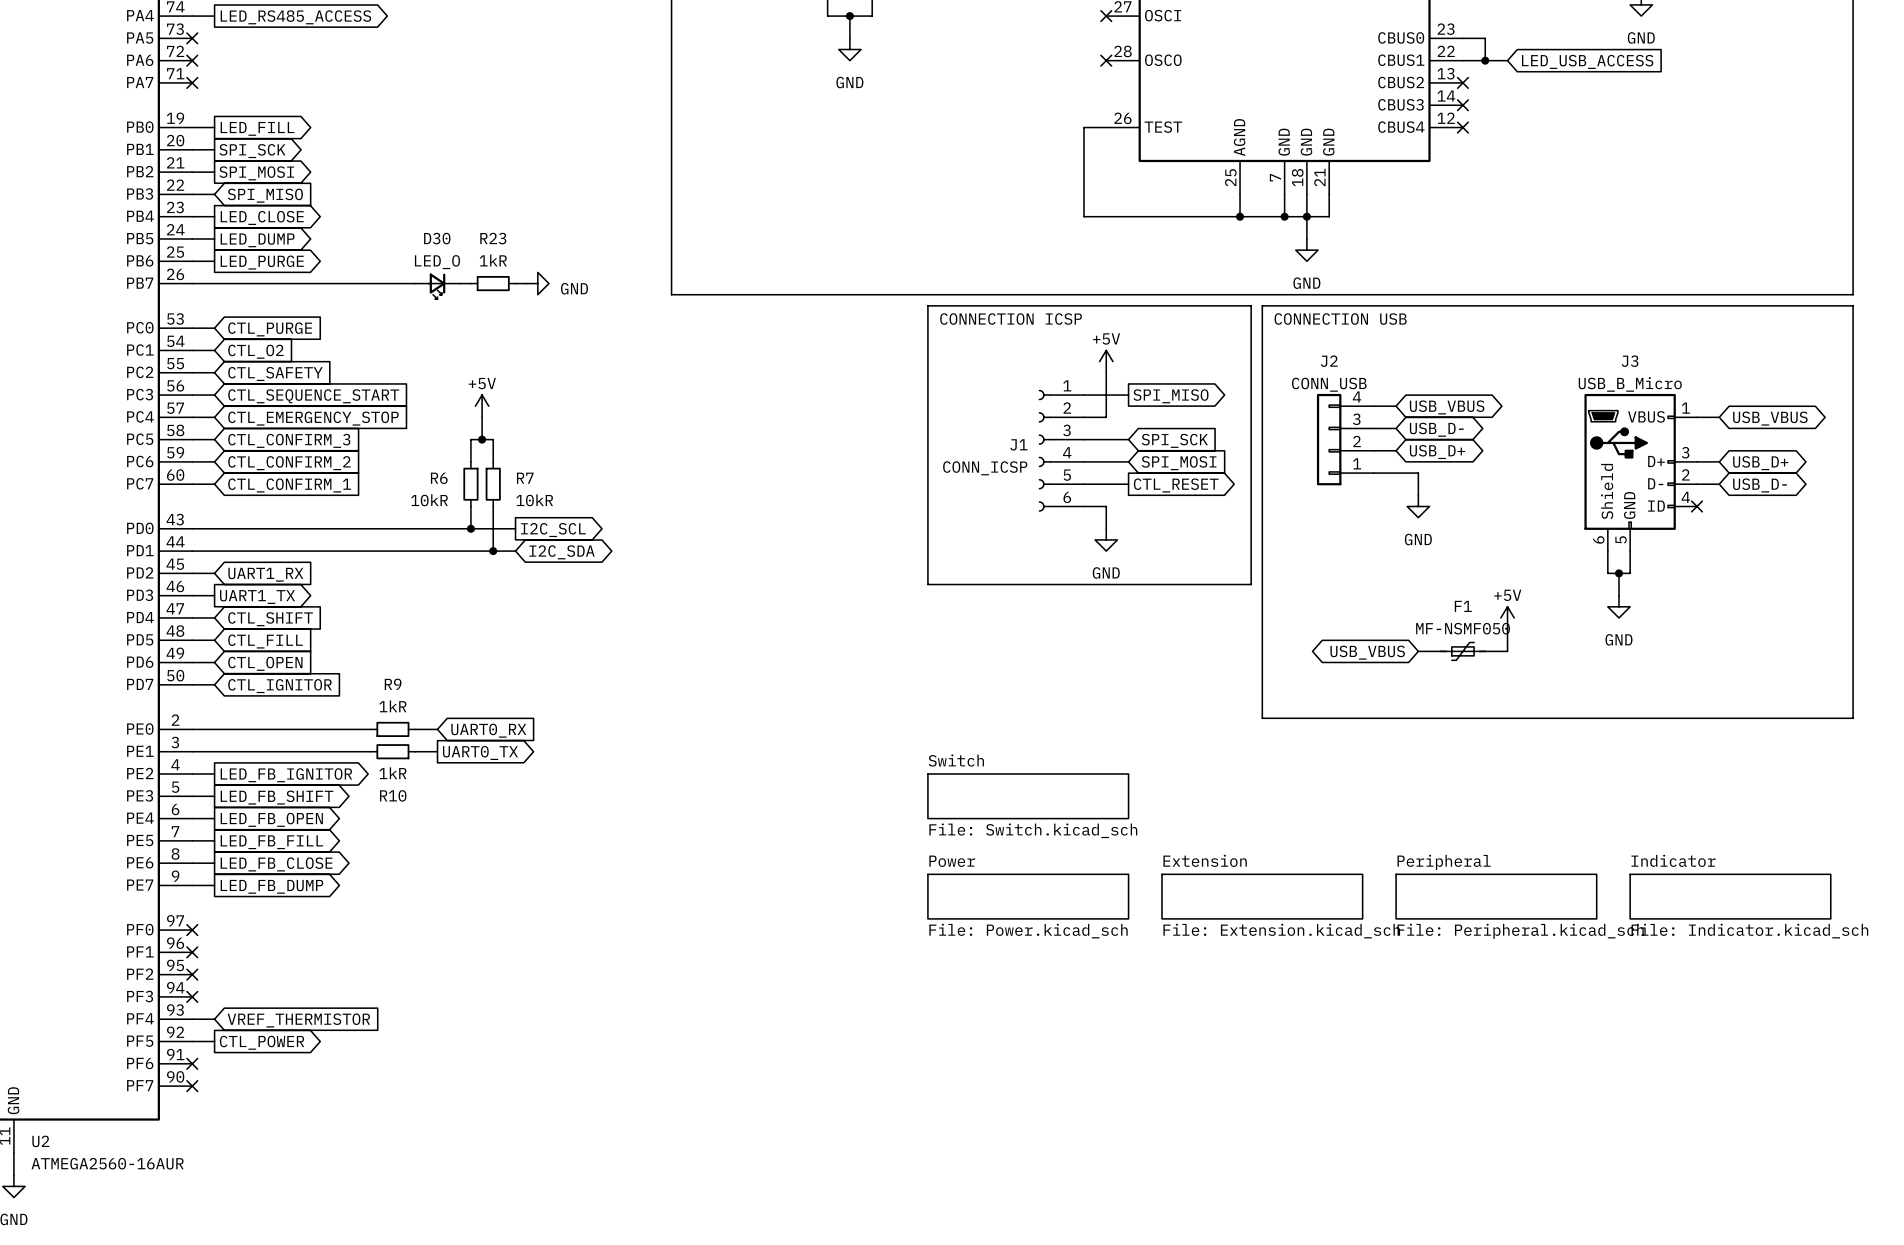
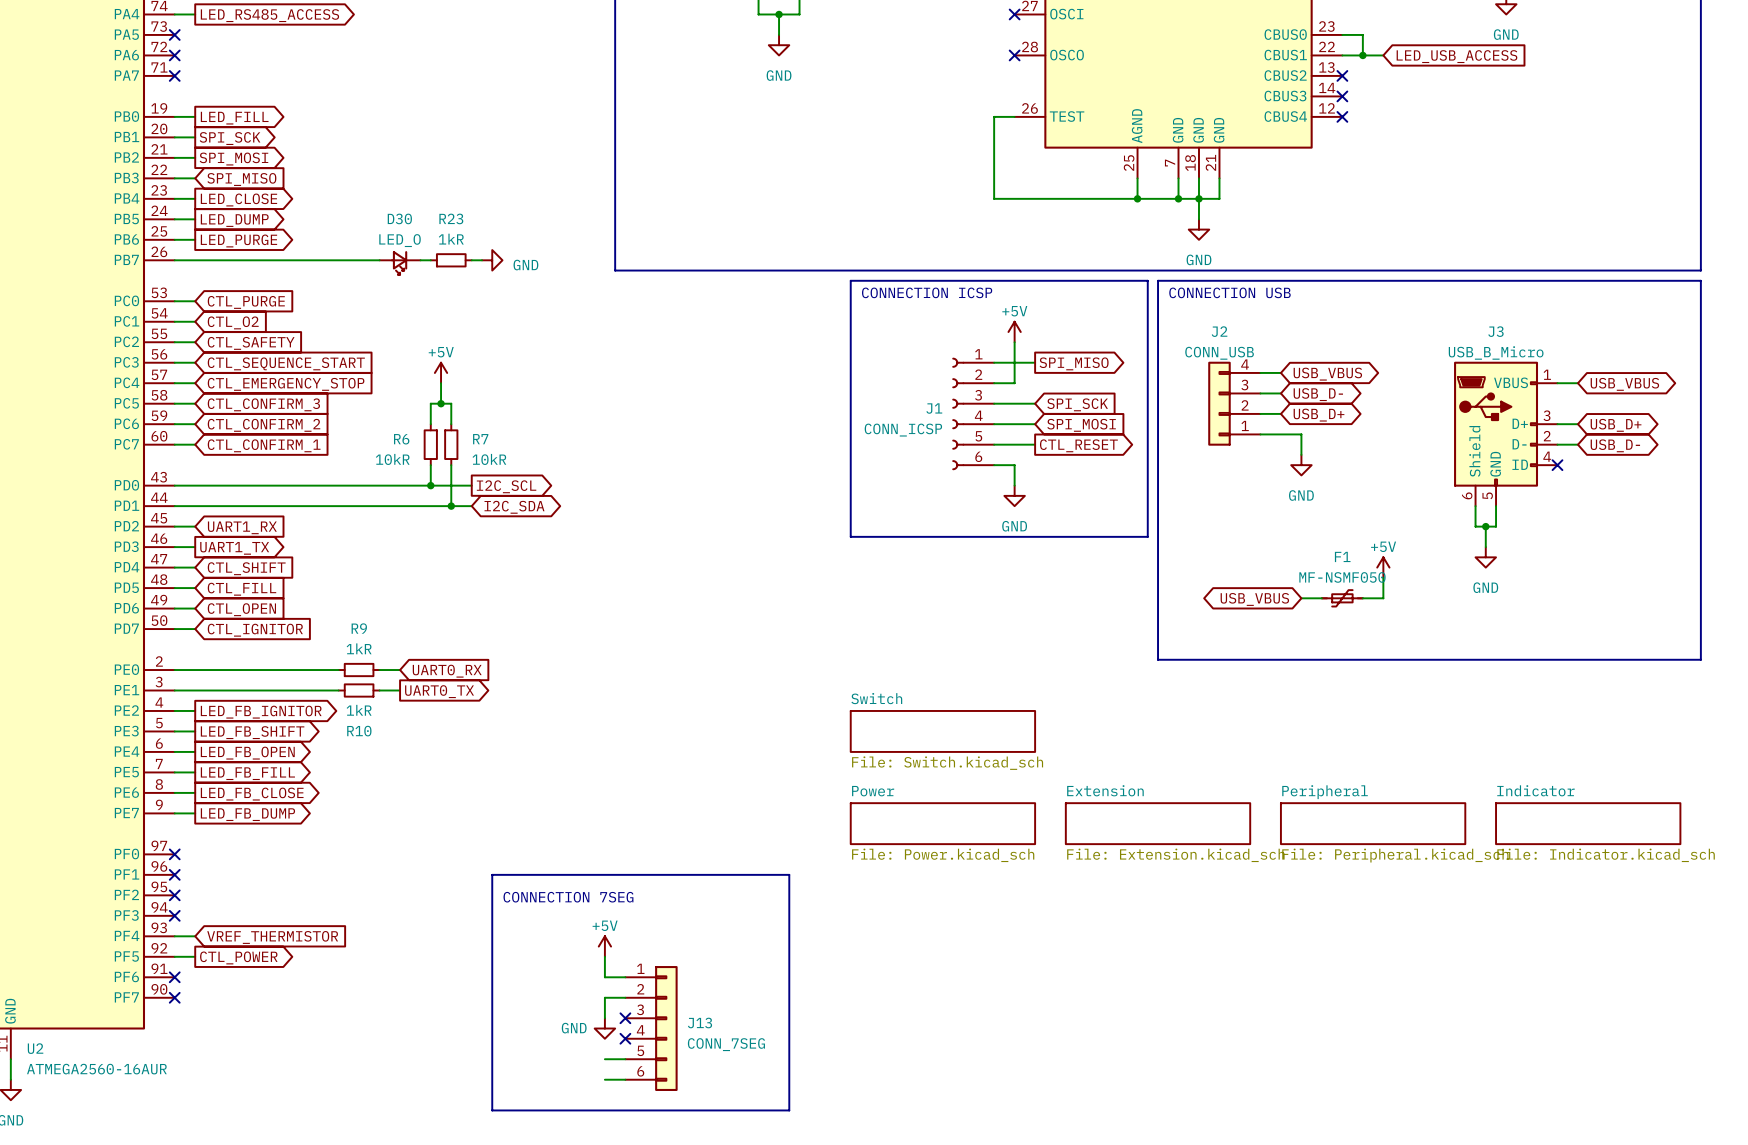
line: none -> (492, 874) (789, 874) (789, 1110) (492, 1110) (492, 874)
text: none -> CONNECTION 7SEG (568, 897)
power symbol: none -> +5V (604, 946)
wire: none -> (604, 956) (604, 977) (625, 977)
wire: none -> (625, 997) (604, 997) (604, 1018)
no-connect mark: none -> (625, 1018)
power symbol: none -> GND (604, 1028)
J13: none -> CONN_7SEG (651, 1028)
no-connect mark: none -> (625, 1038)
wire: none -> (604, 1059) (625, 1059)
wire: none -> (604, 1079) (625, 1079)

